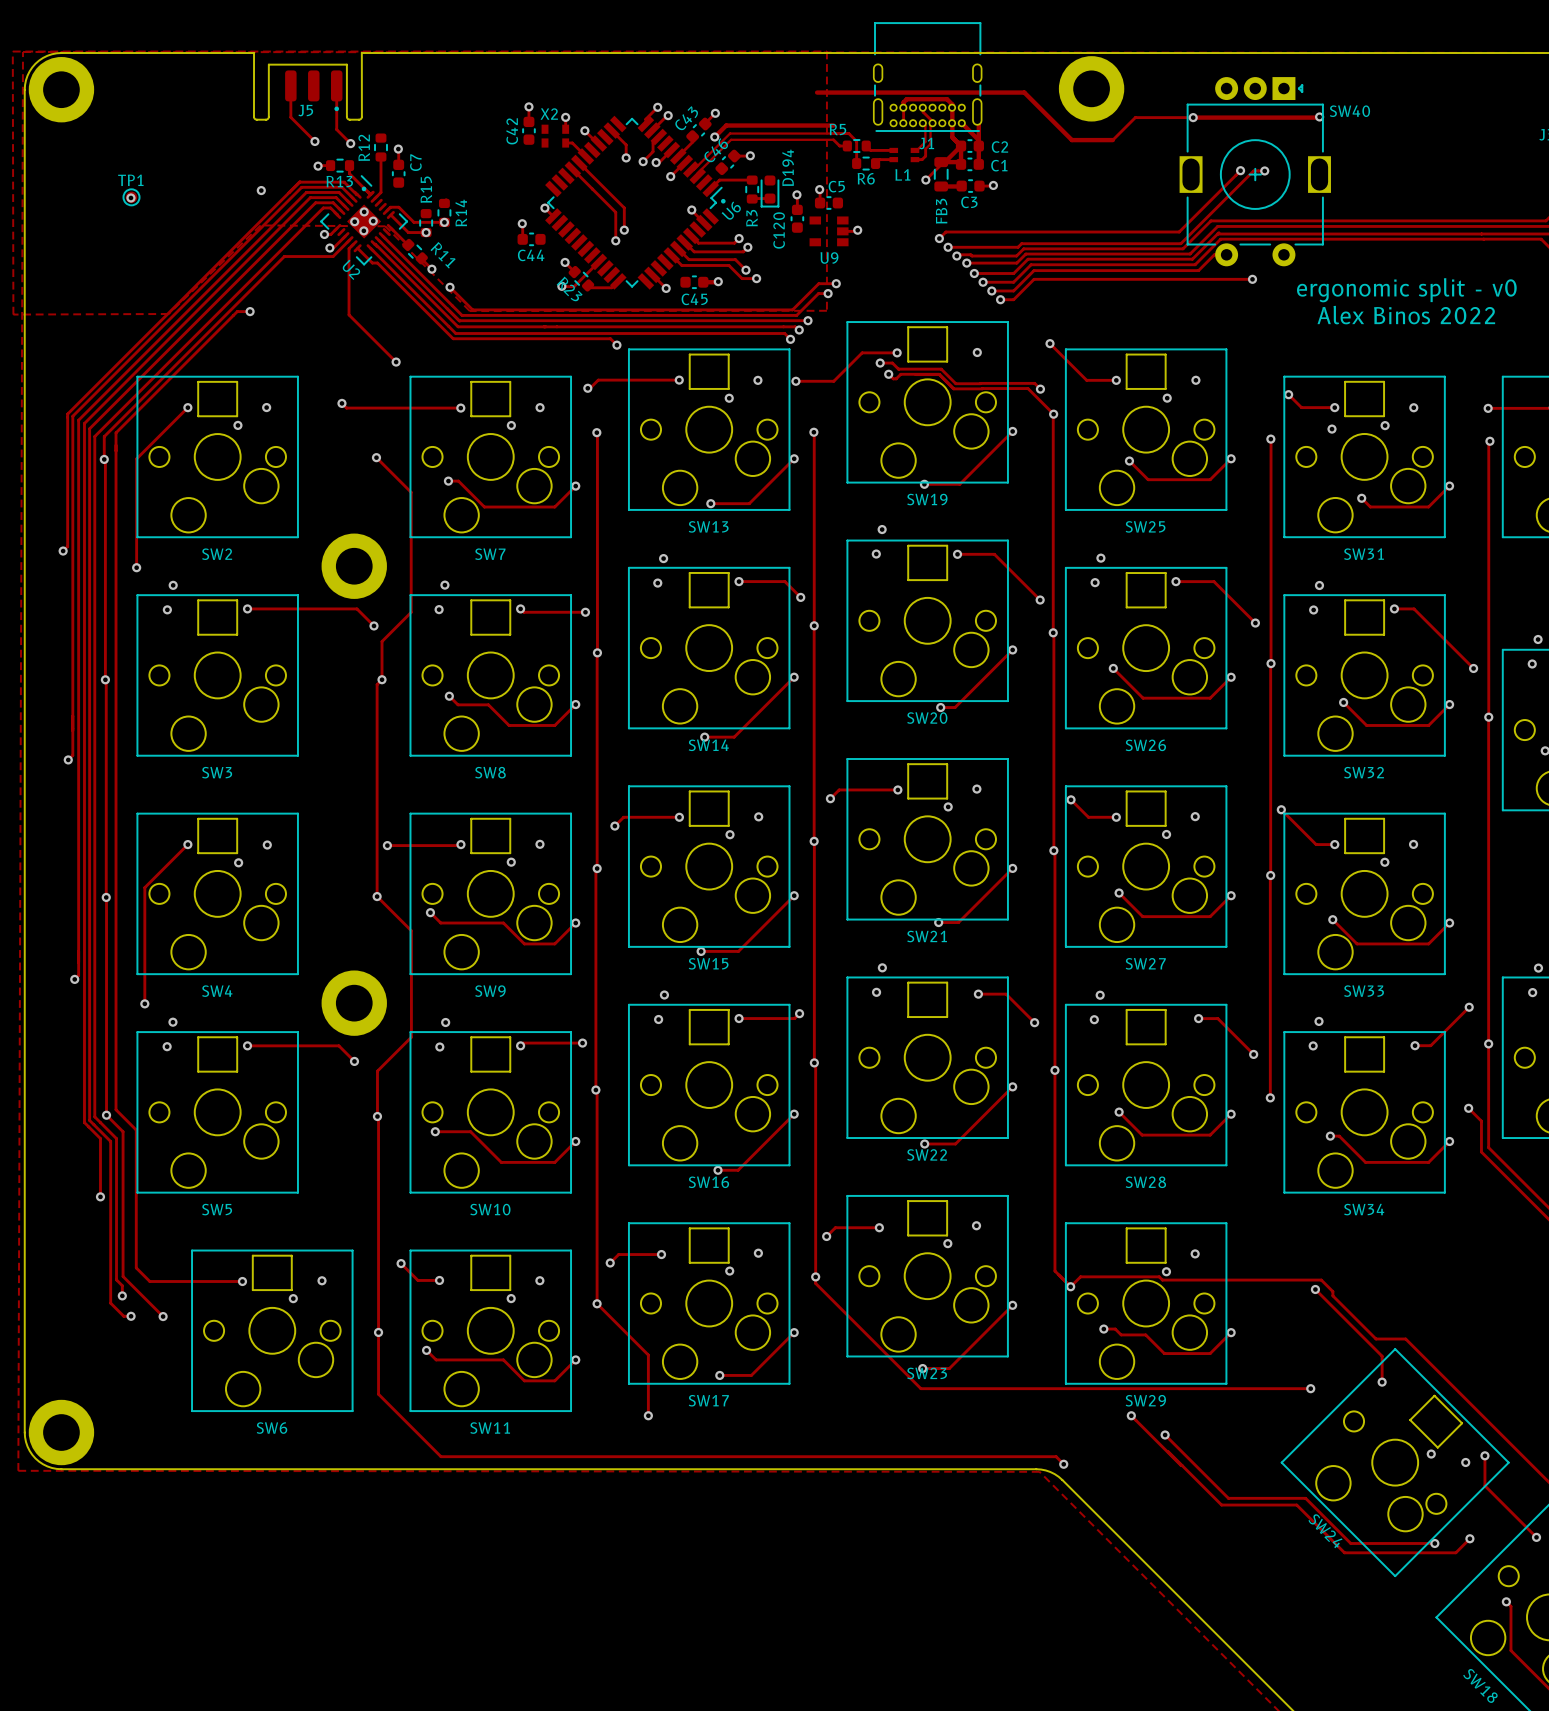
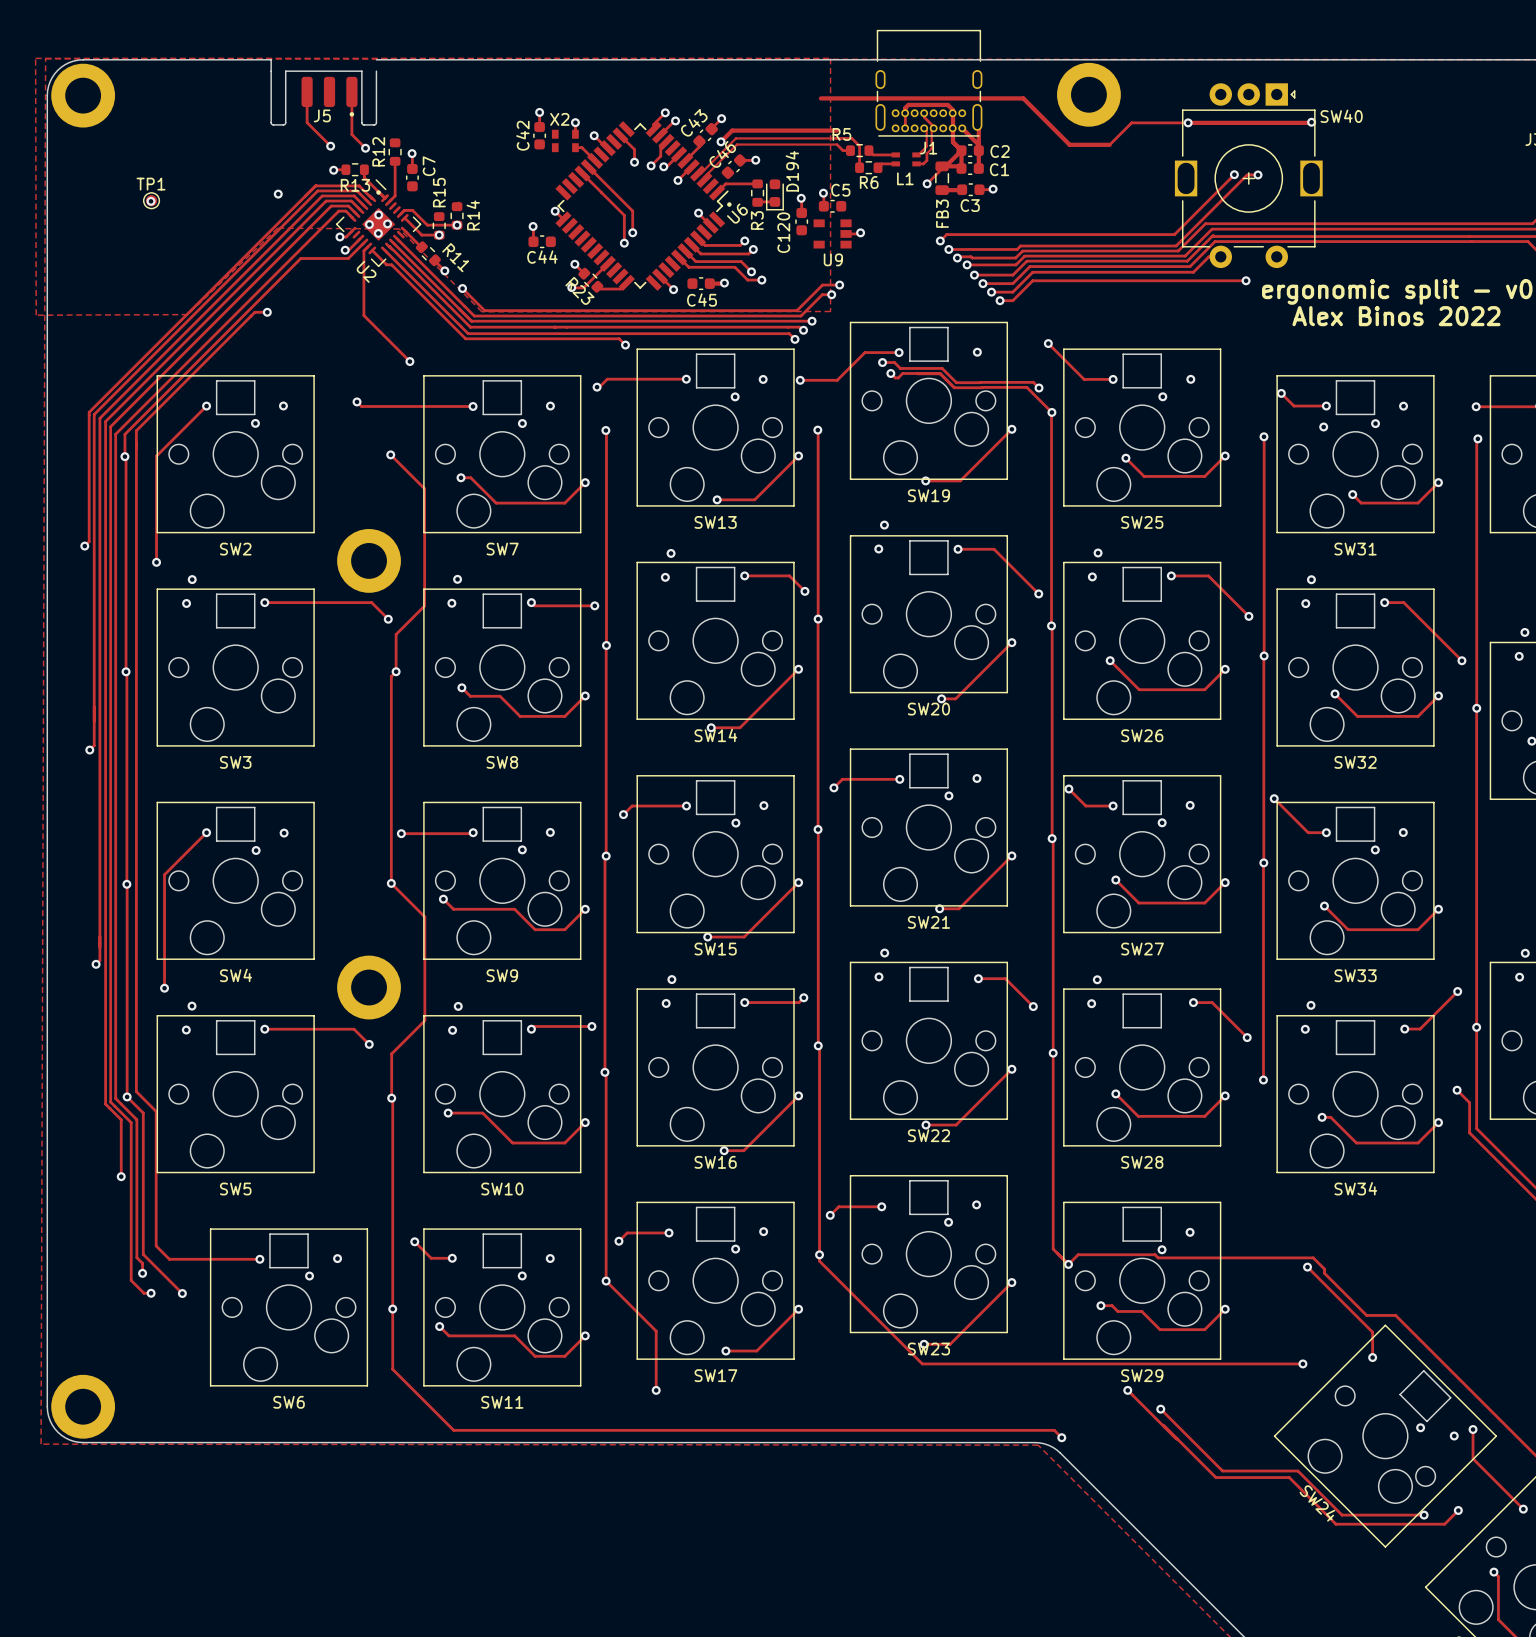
board edge: (254, 53) (253, 116) (256, 119) (266, 119) (268, 117) (268, 64) (346, 64) (347, 117) (349, 119) (360, 119) (361, 53) -> (271, 59) (271, 71)
J5 footprint: [285, 70, 343, 112] -> [270, 70, 377, 126]

